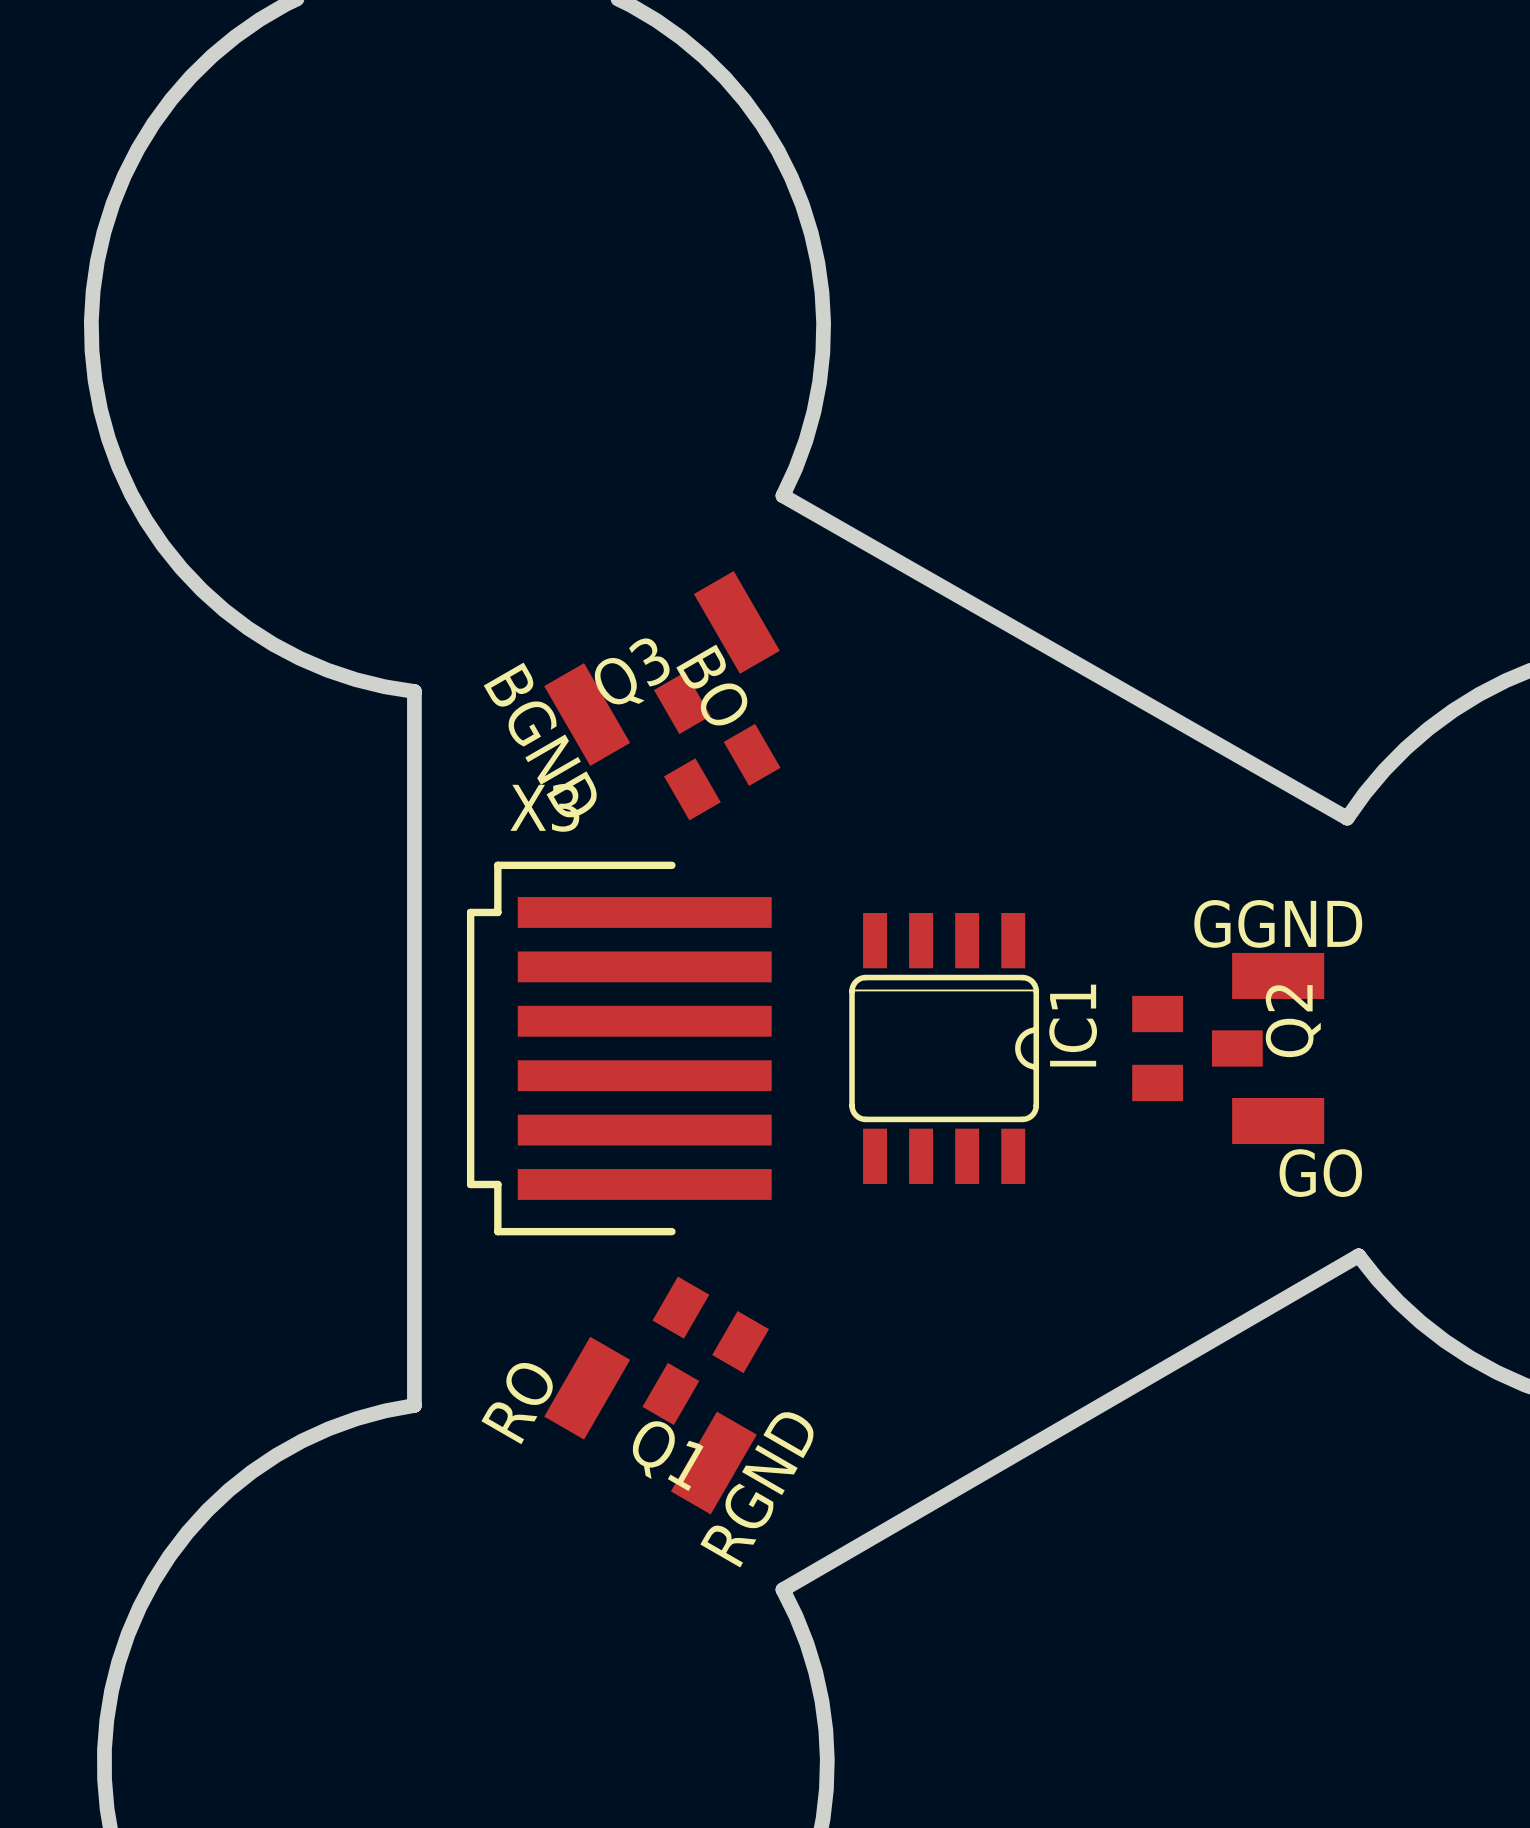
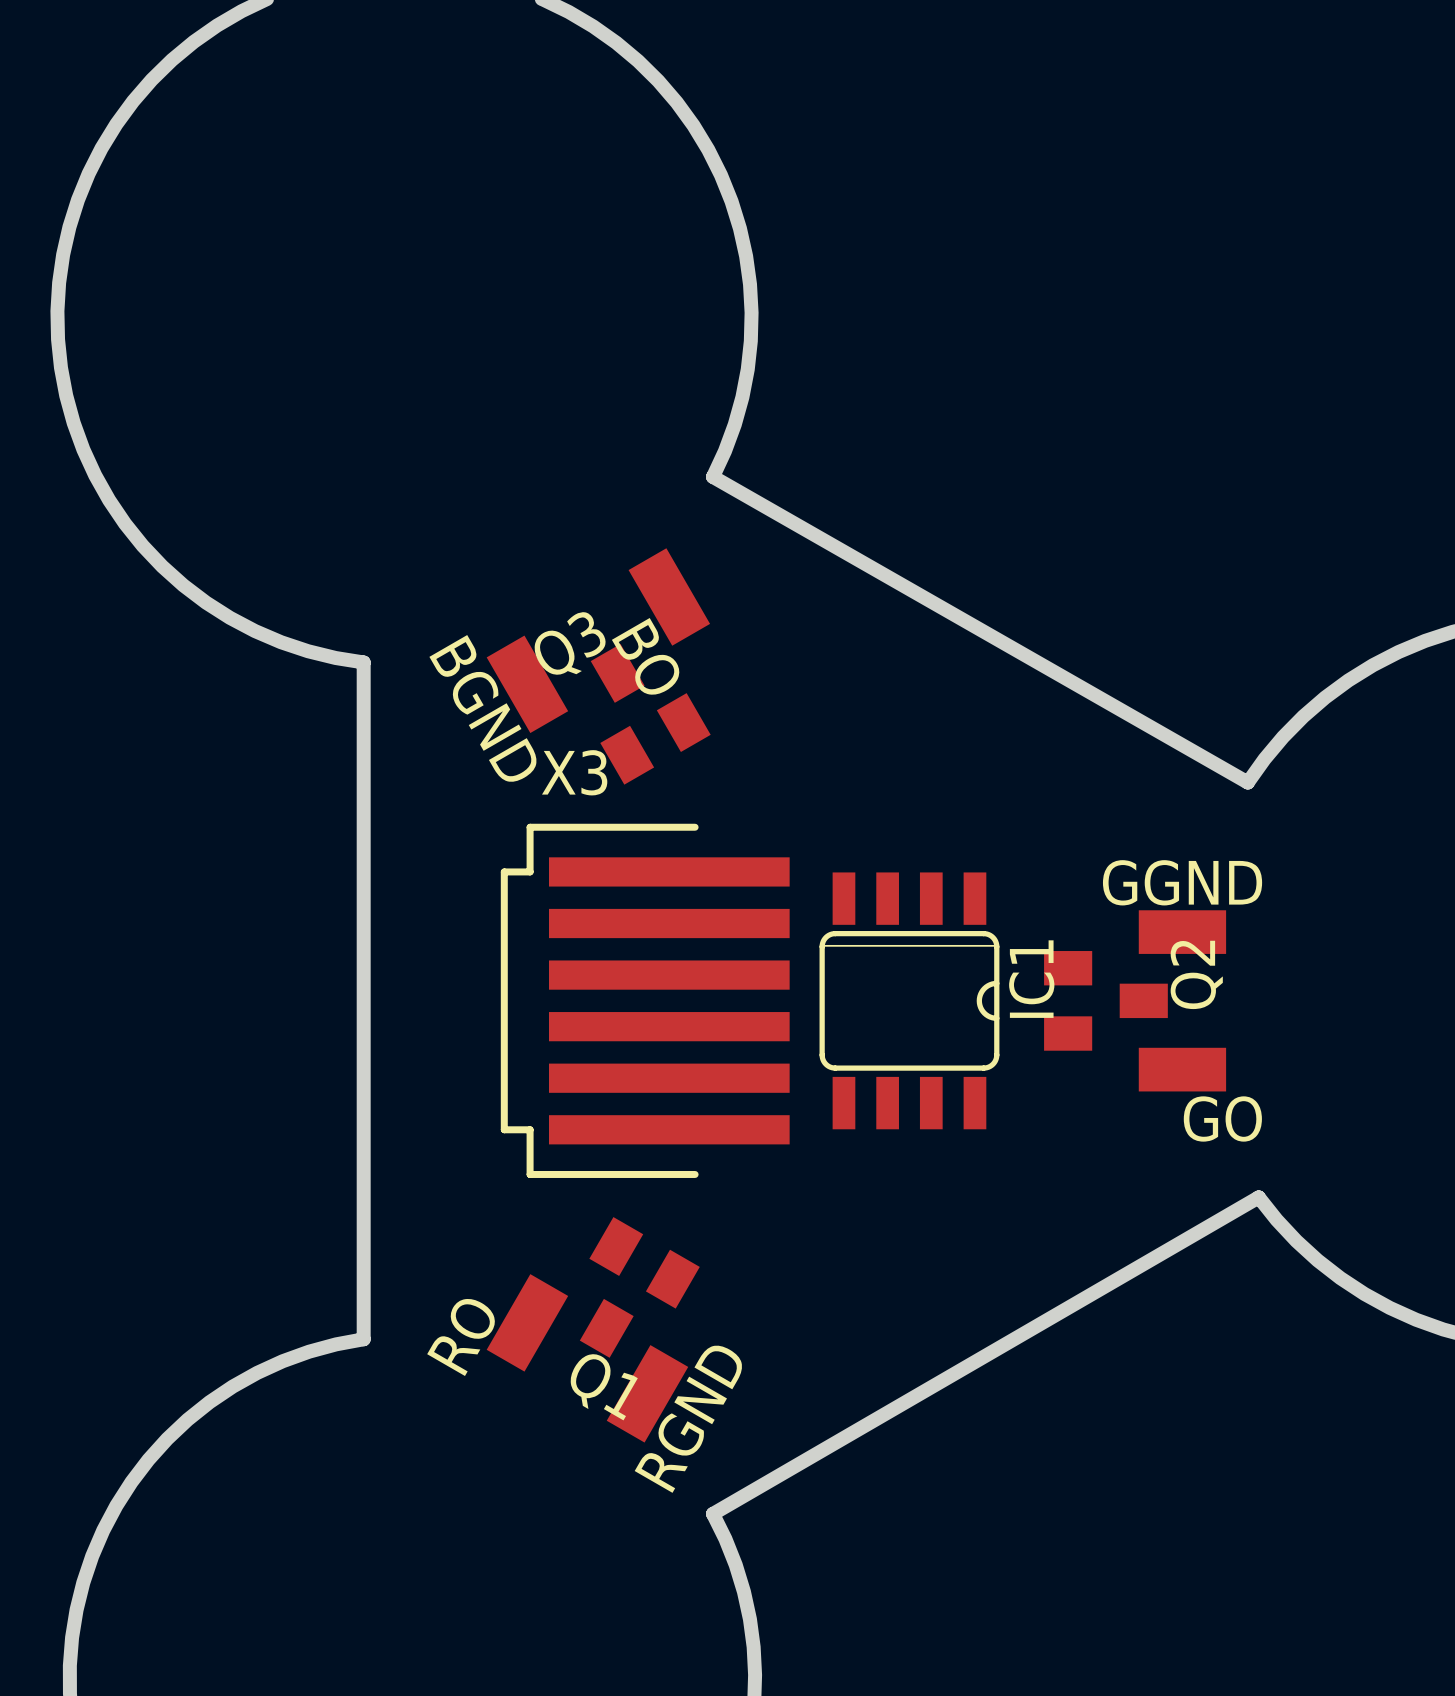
X3 position: (619, 1048) -> (645, 1000)
IC1 position: (944, 1048) -> (909, 1000)

